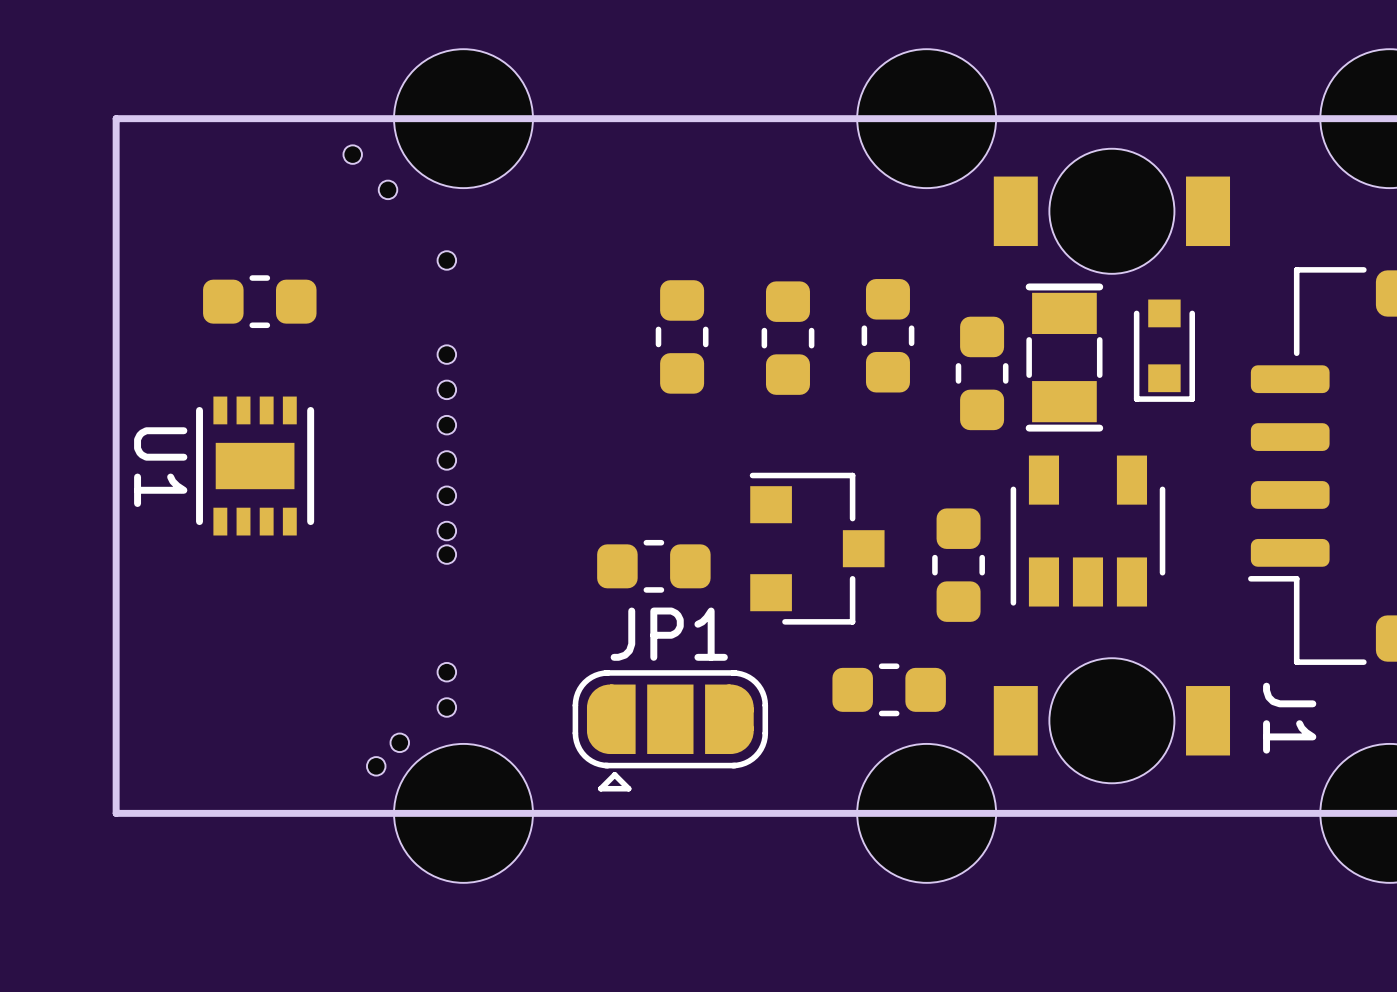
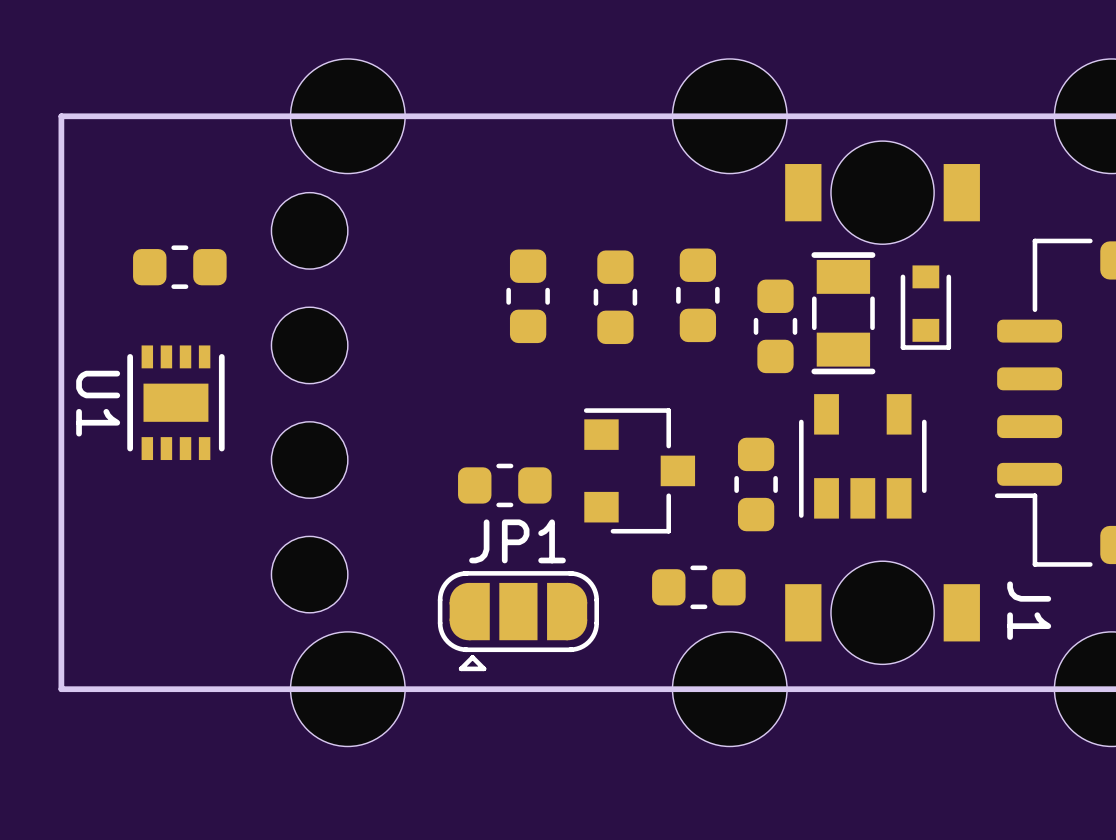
part: (352, 154) -> none
part: (388, 189) -> none
part footprint: [437, 251, 457, 270] -> [271, 192, 348, 270]
part: (446, 354) -> none
part: (446, 389) -> none
part: none -> (309, 345)
part: (446, 425) -> none
part: (446, 460) -> none
part: (446, 495) -> none
part: (446, 531) -> none
part: none -> (309, 460)
part: (446, 554) -> none
part: (446, 672) -> none
part: none -> (309, 574)
part: (446, 707) -> none
part: (399, 742) -> none
part: (376, 766) -> none

